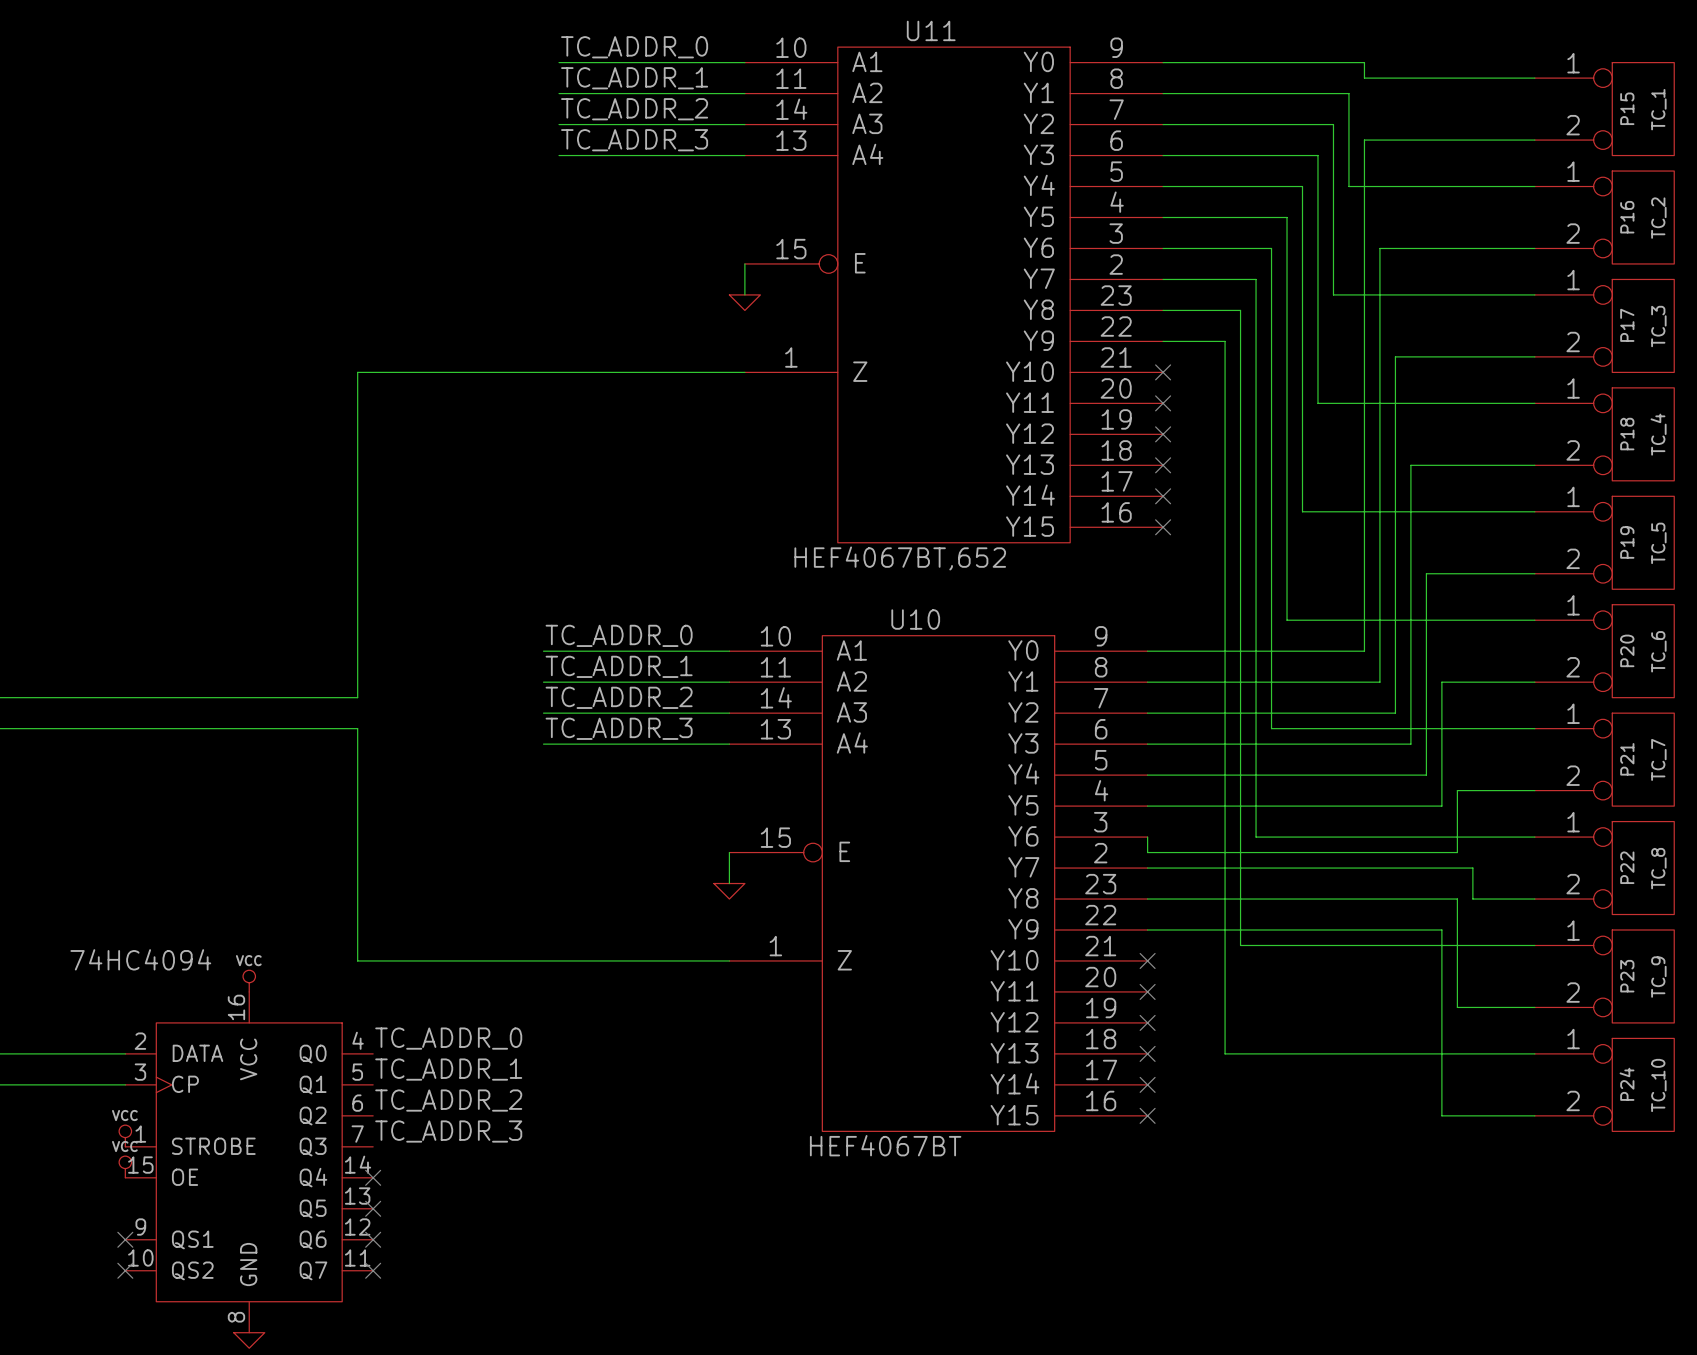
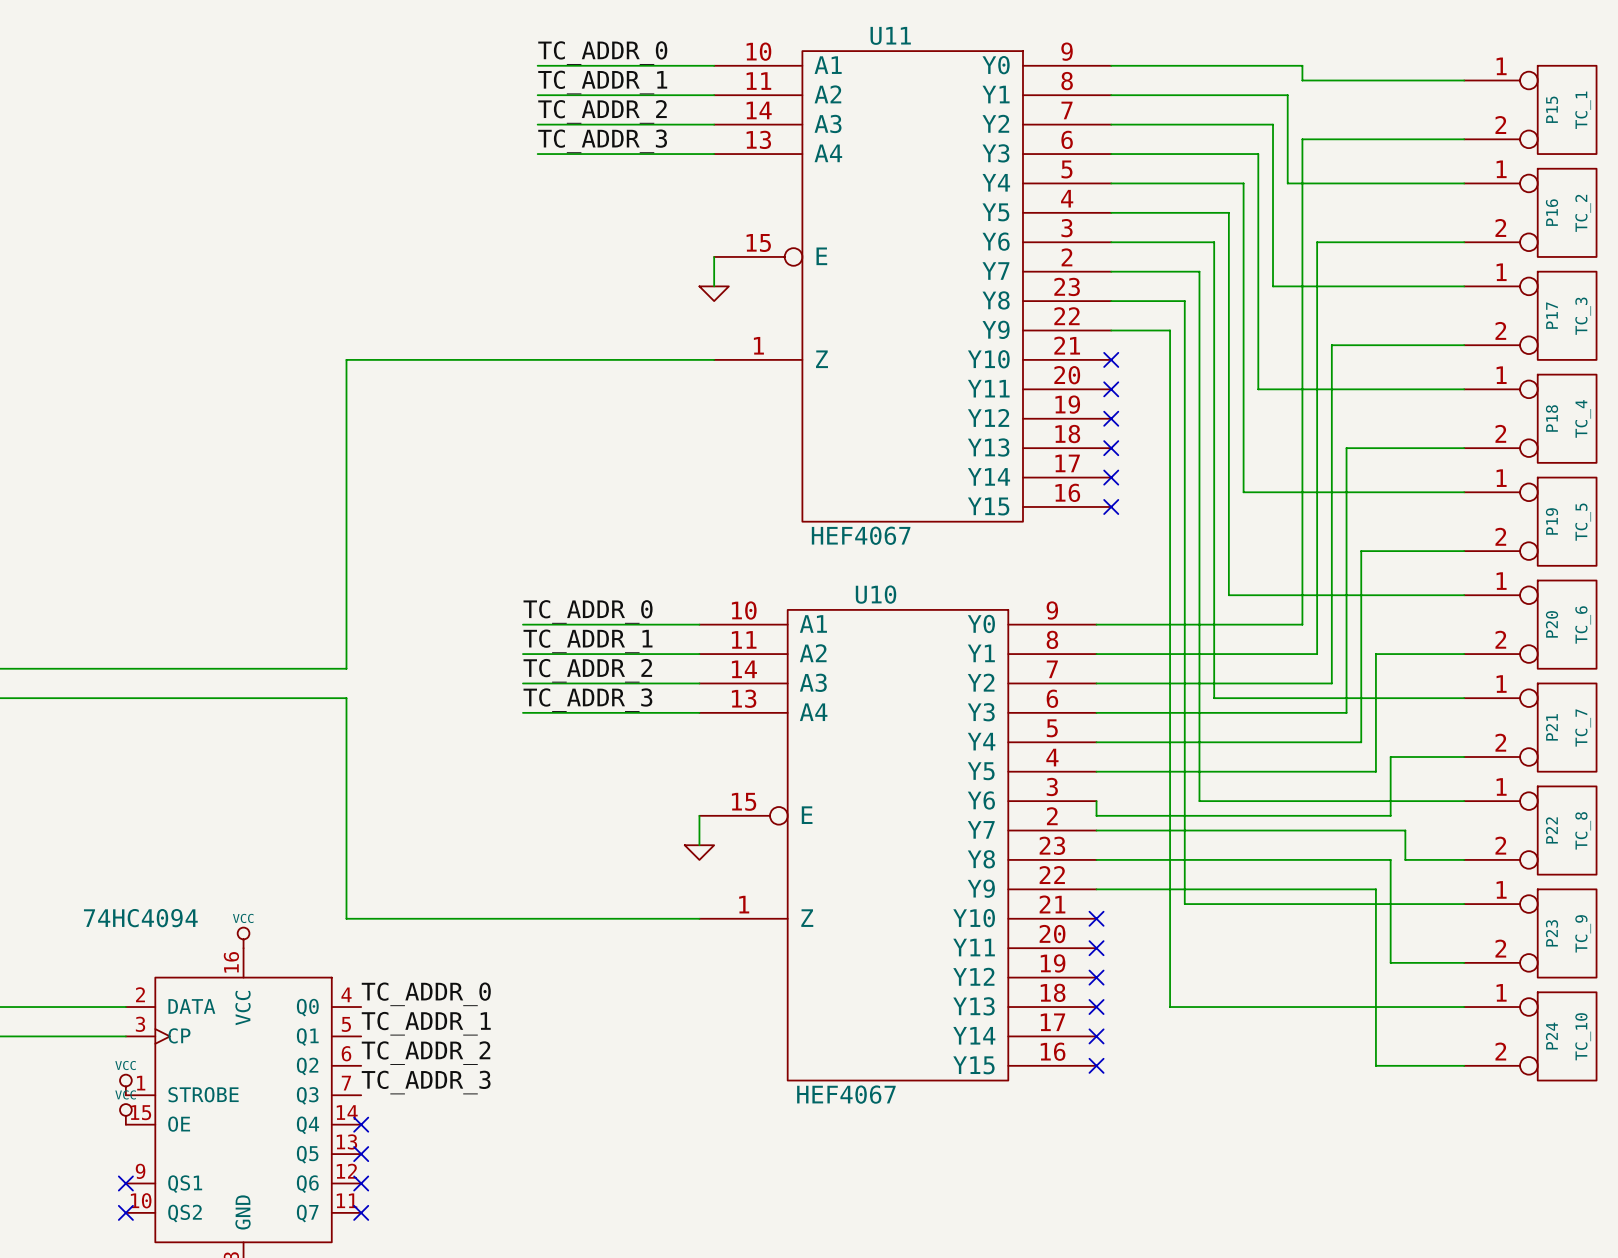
U11 value: HEF4067BT,652 (900, 558) -> HEF4067 (861, 535)
U10 value: HEF4067BT (885, 1145) -> HEF4067 (846, 1094)

